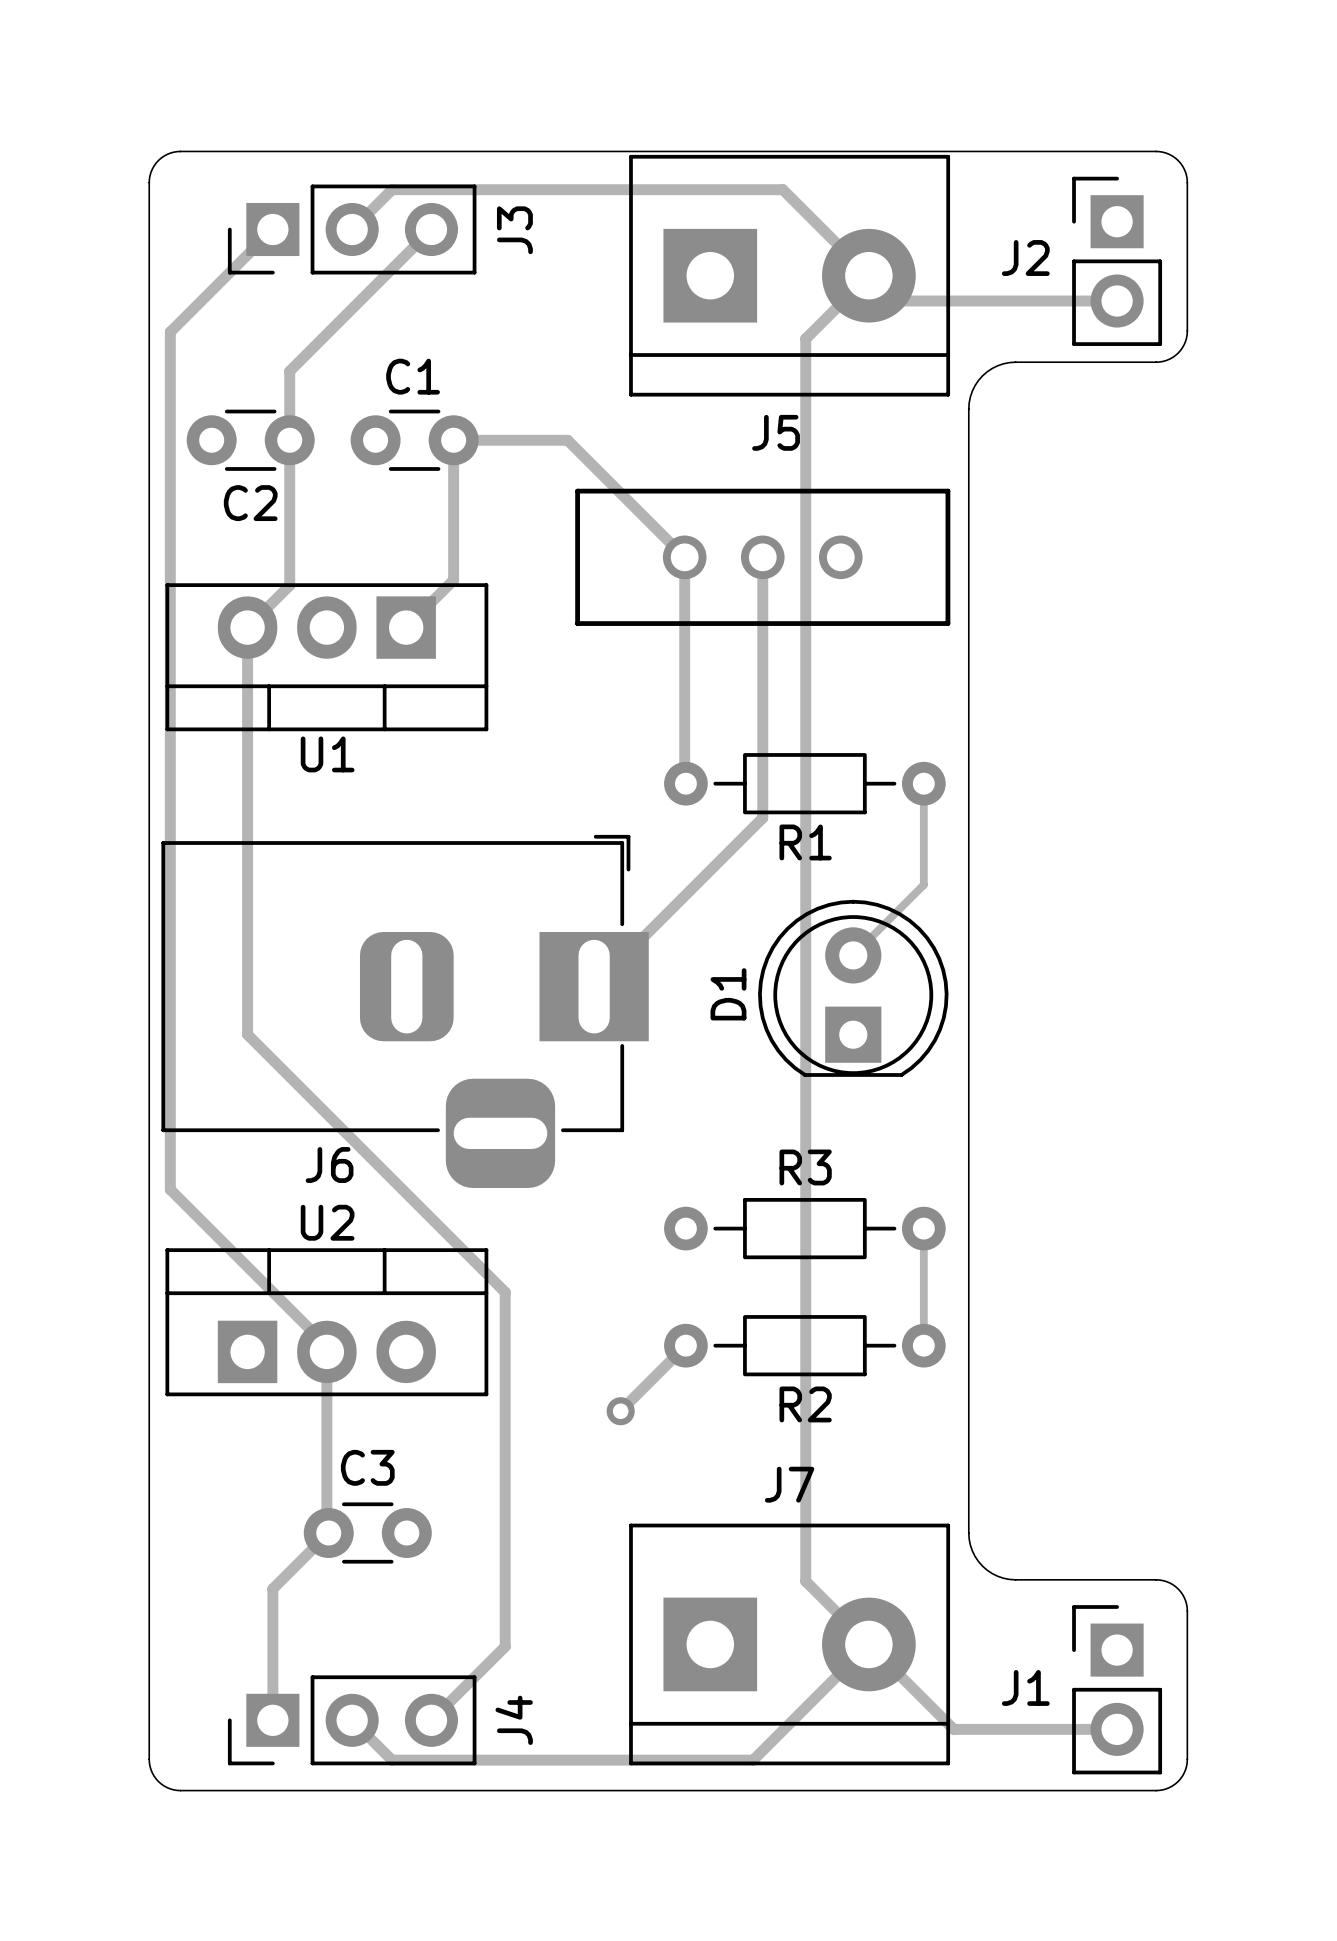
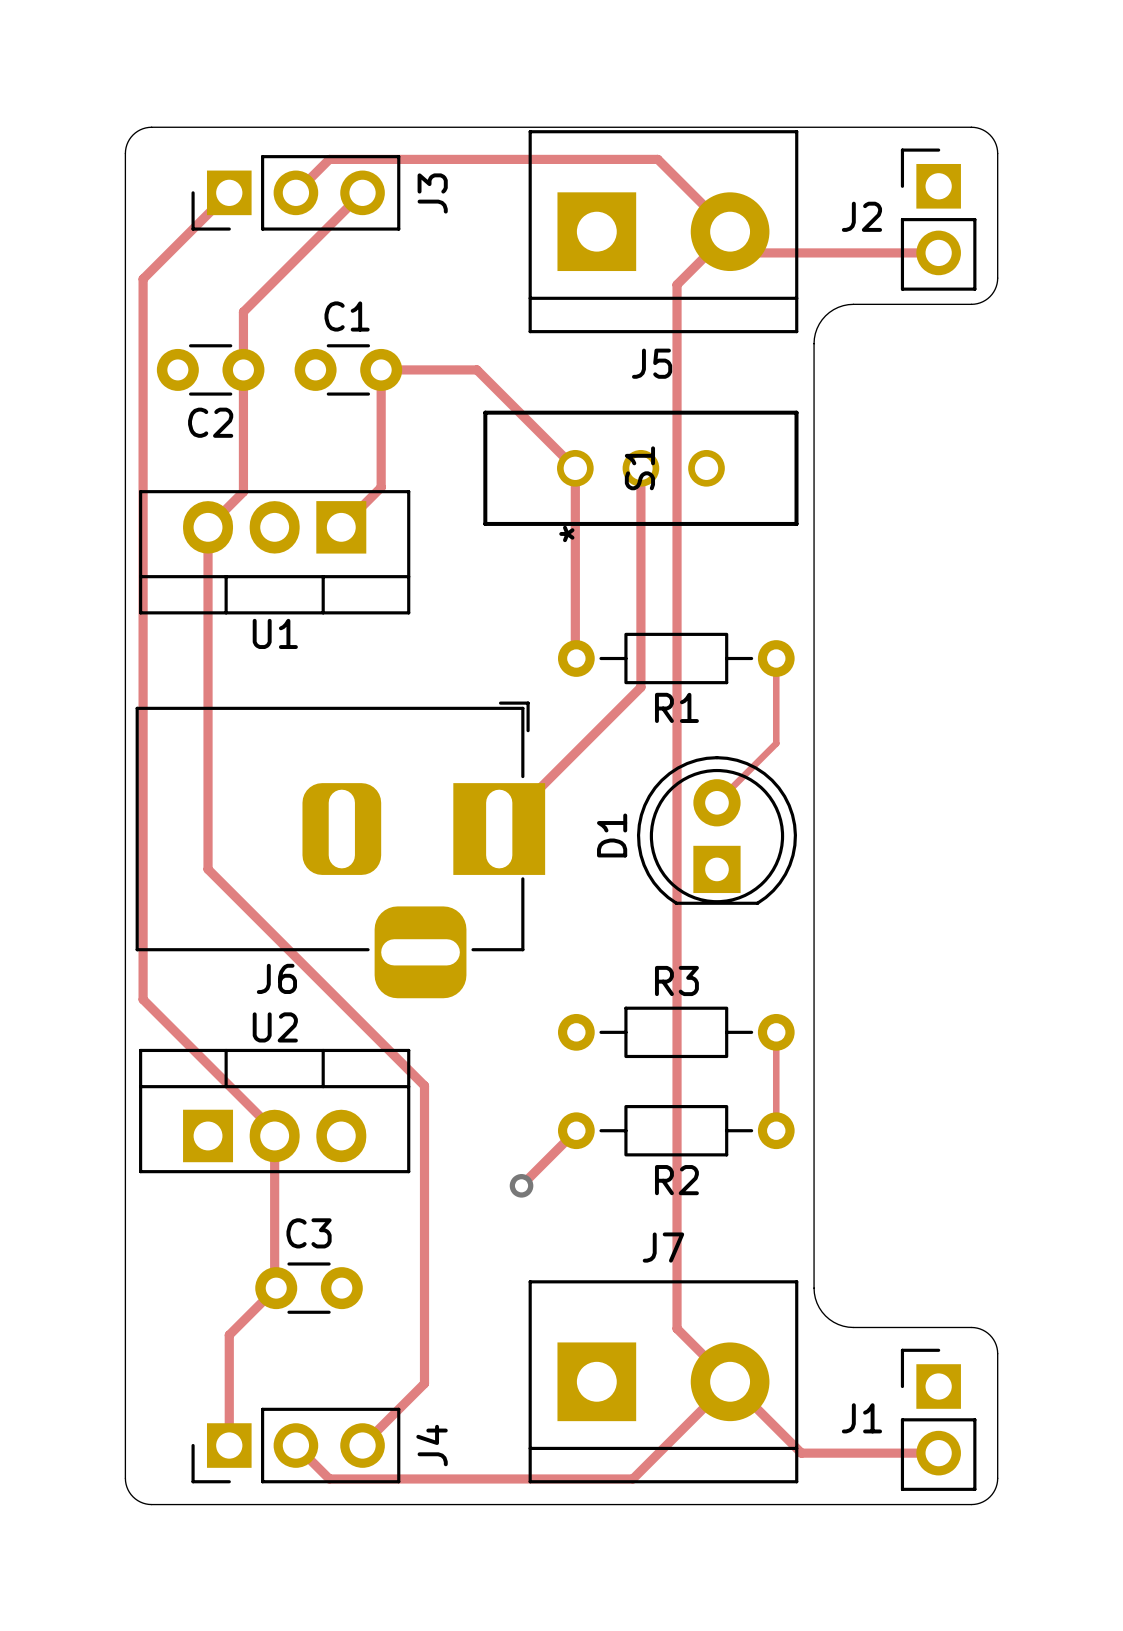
S1 name: none -> S1 (639, 468)
S1 text: none -> * (566, 533)

